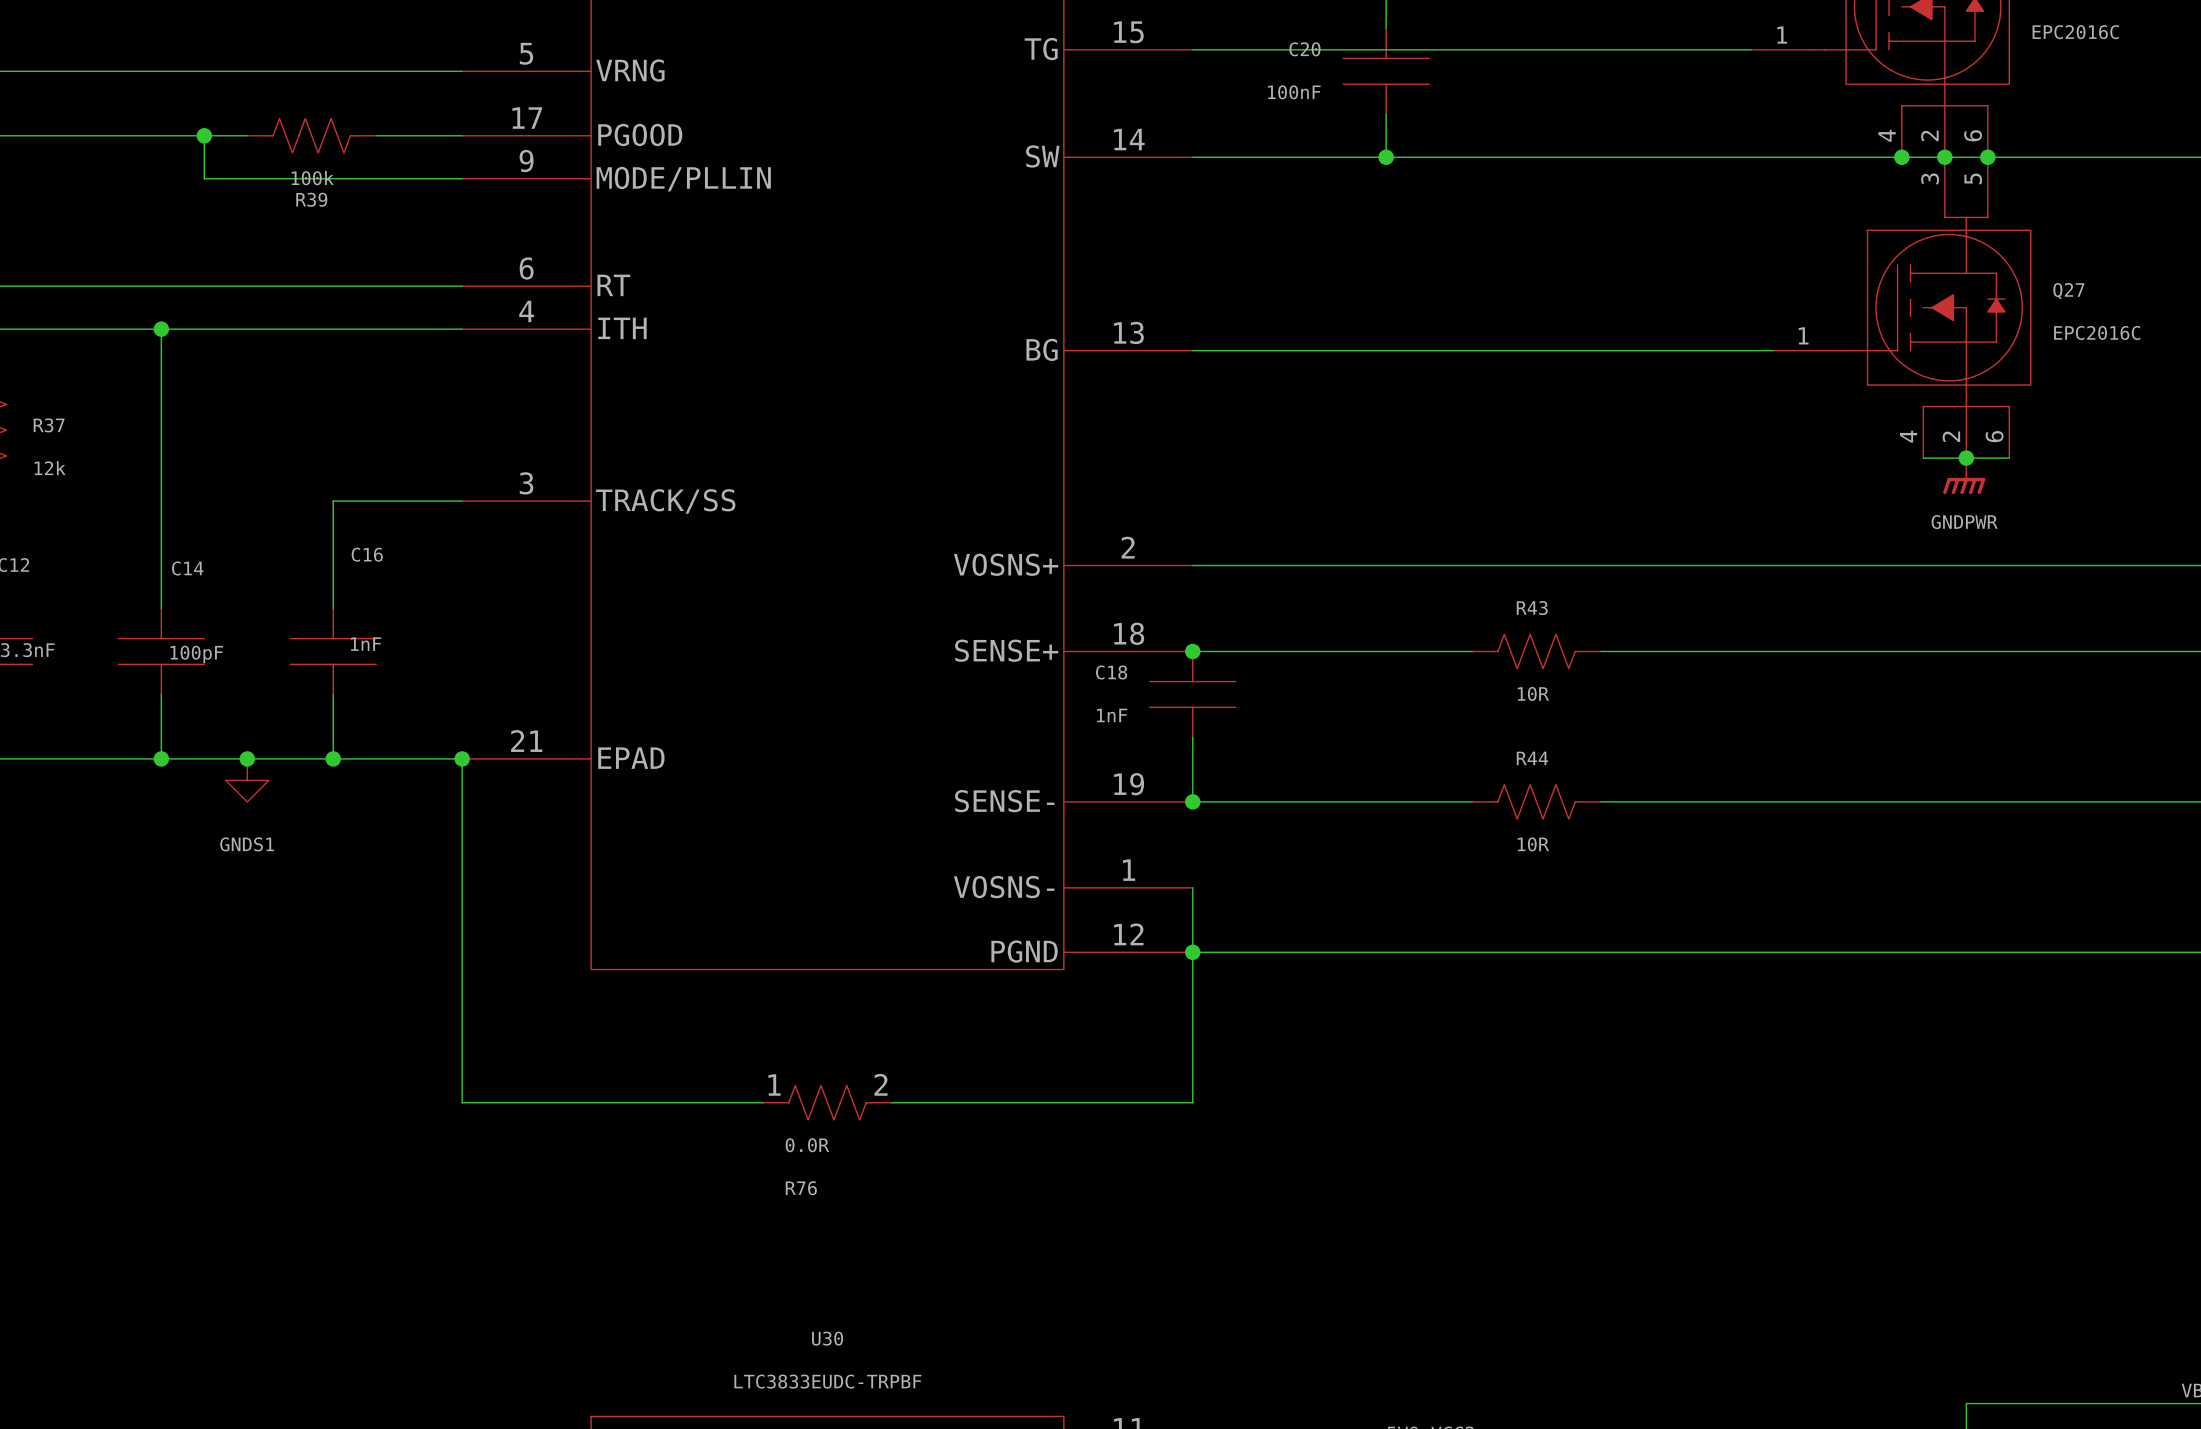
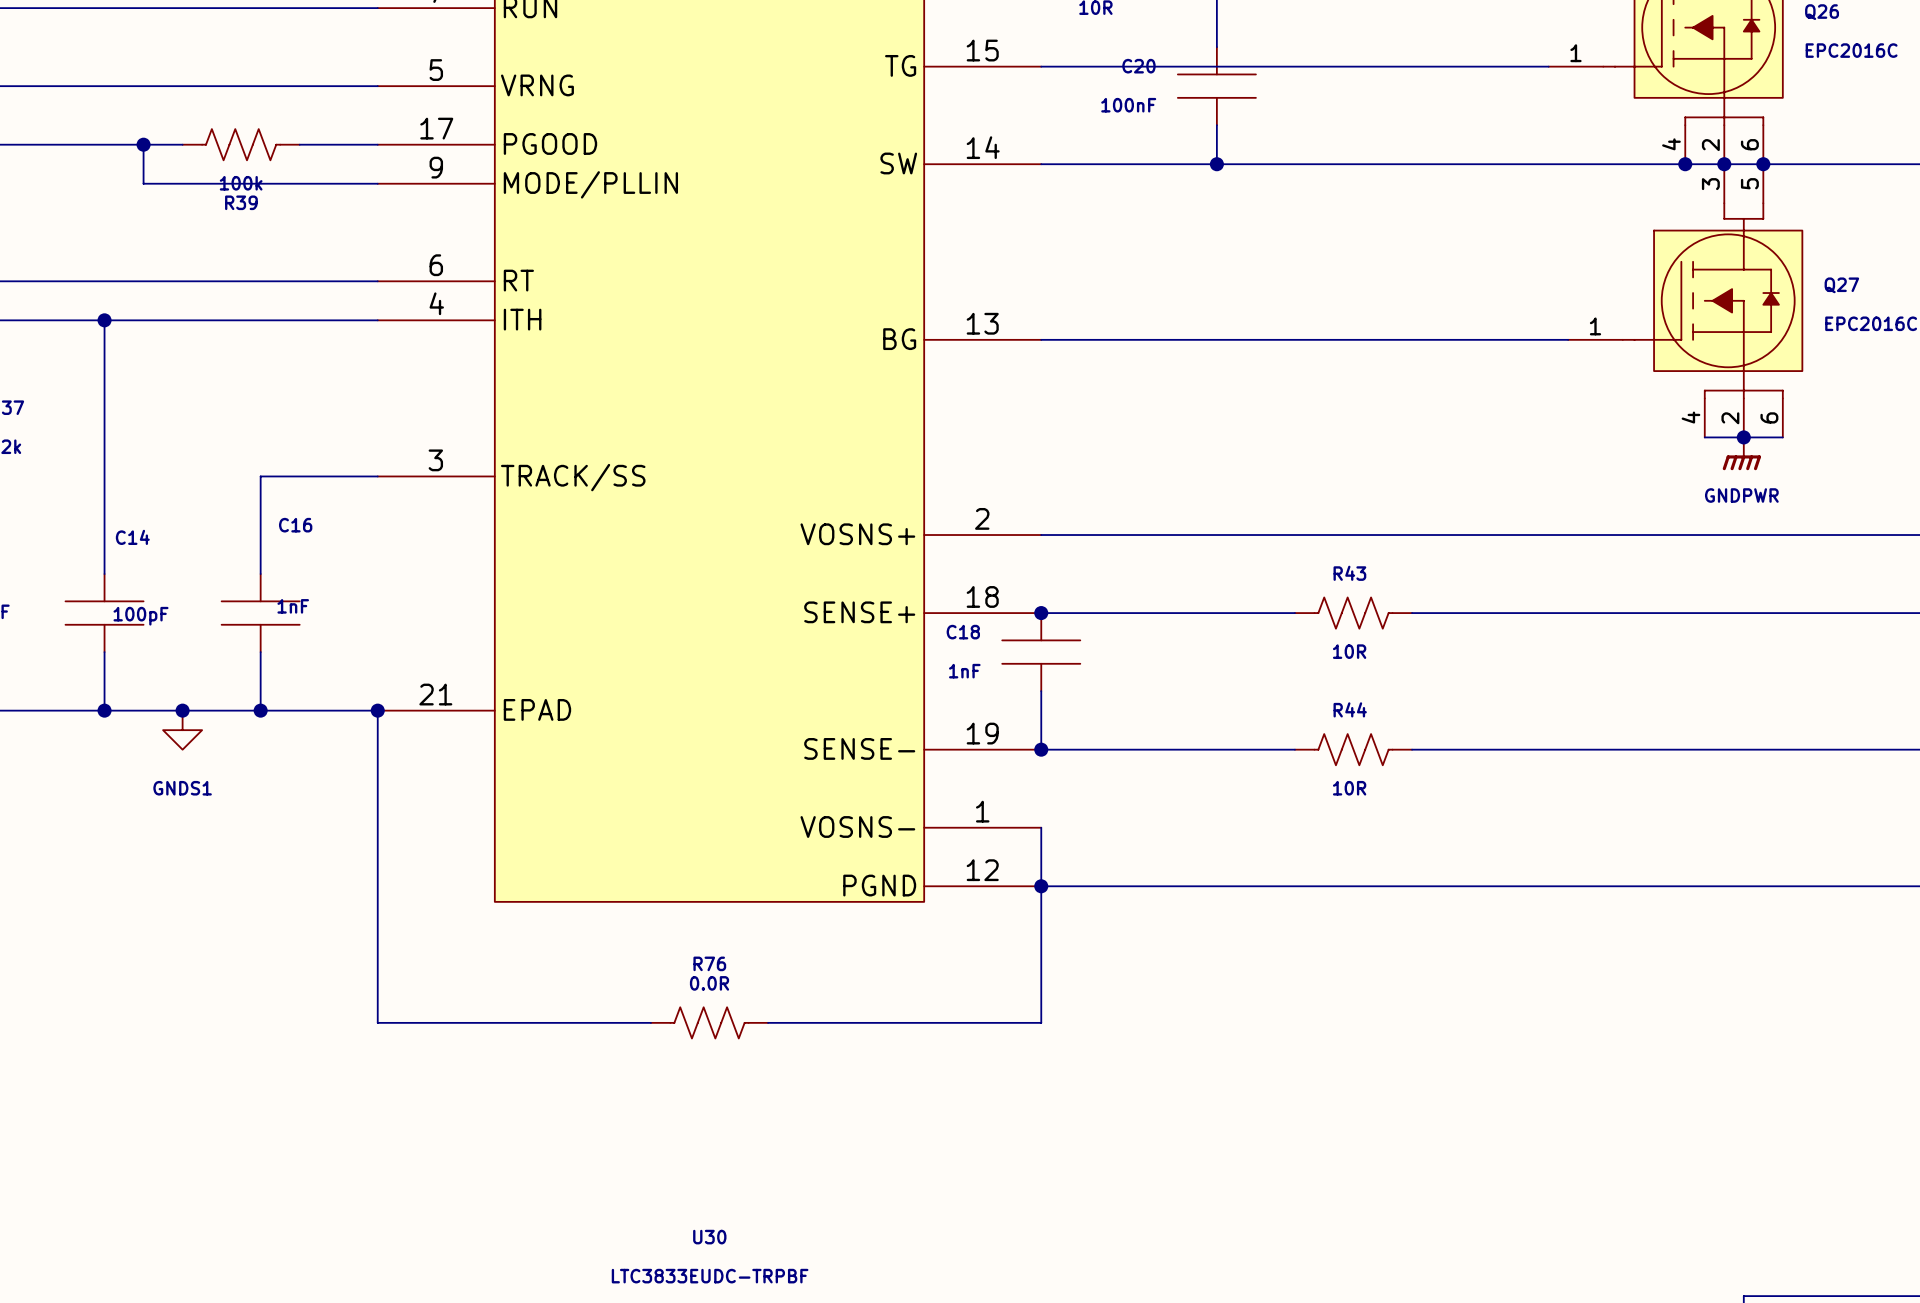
R76 pin number: 2 (881, 1084) -> none
R76 pin number: 1 (774, 1085) -> none
R76 value position: 0.0R (807, 1145) -> 0.0R (709, 983)
R76 name position: R76 (801, 1188) -> R76 (709, 963)

